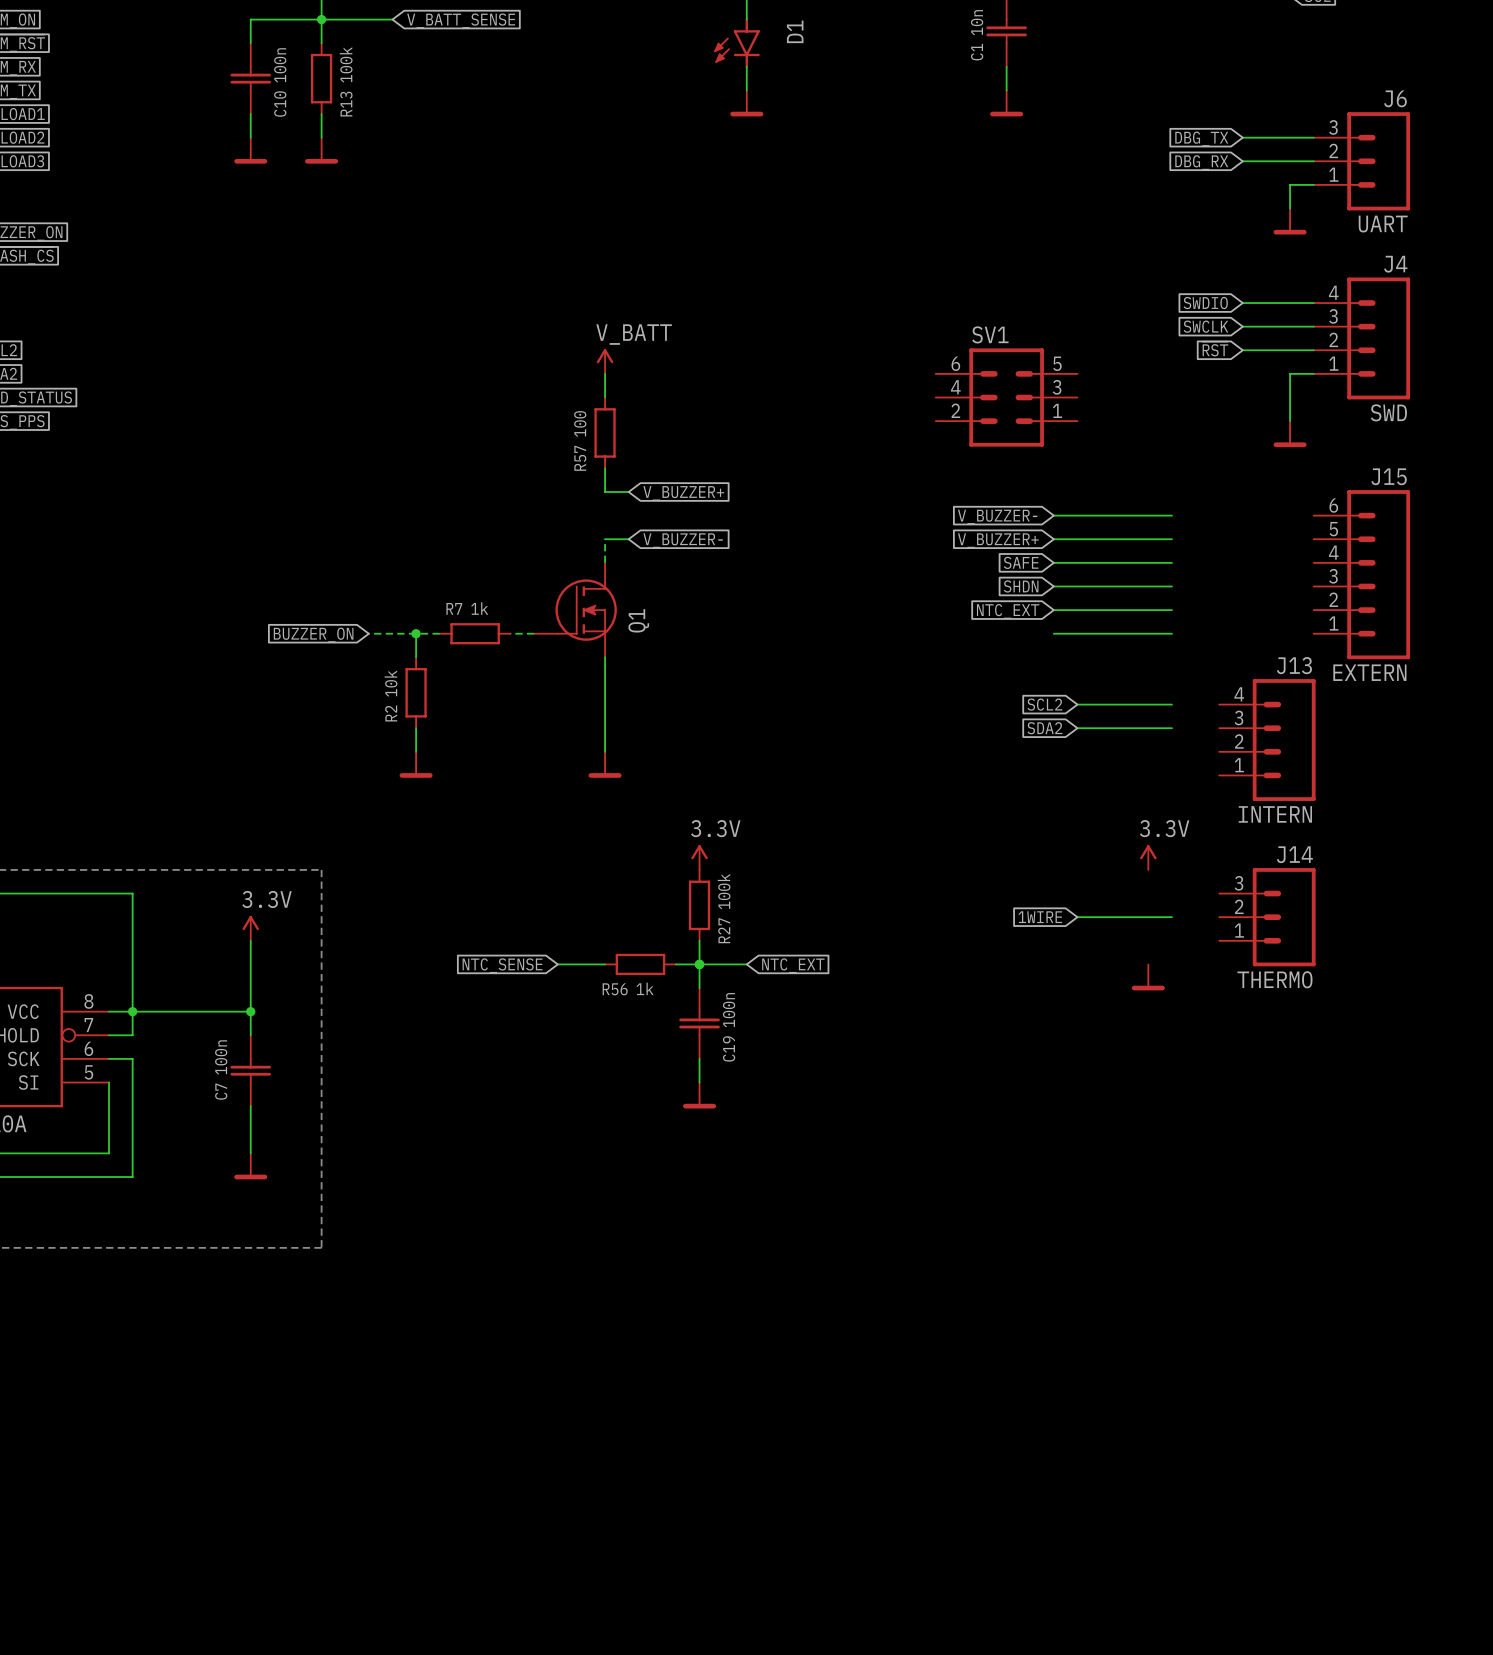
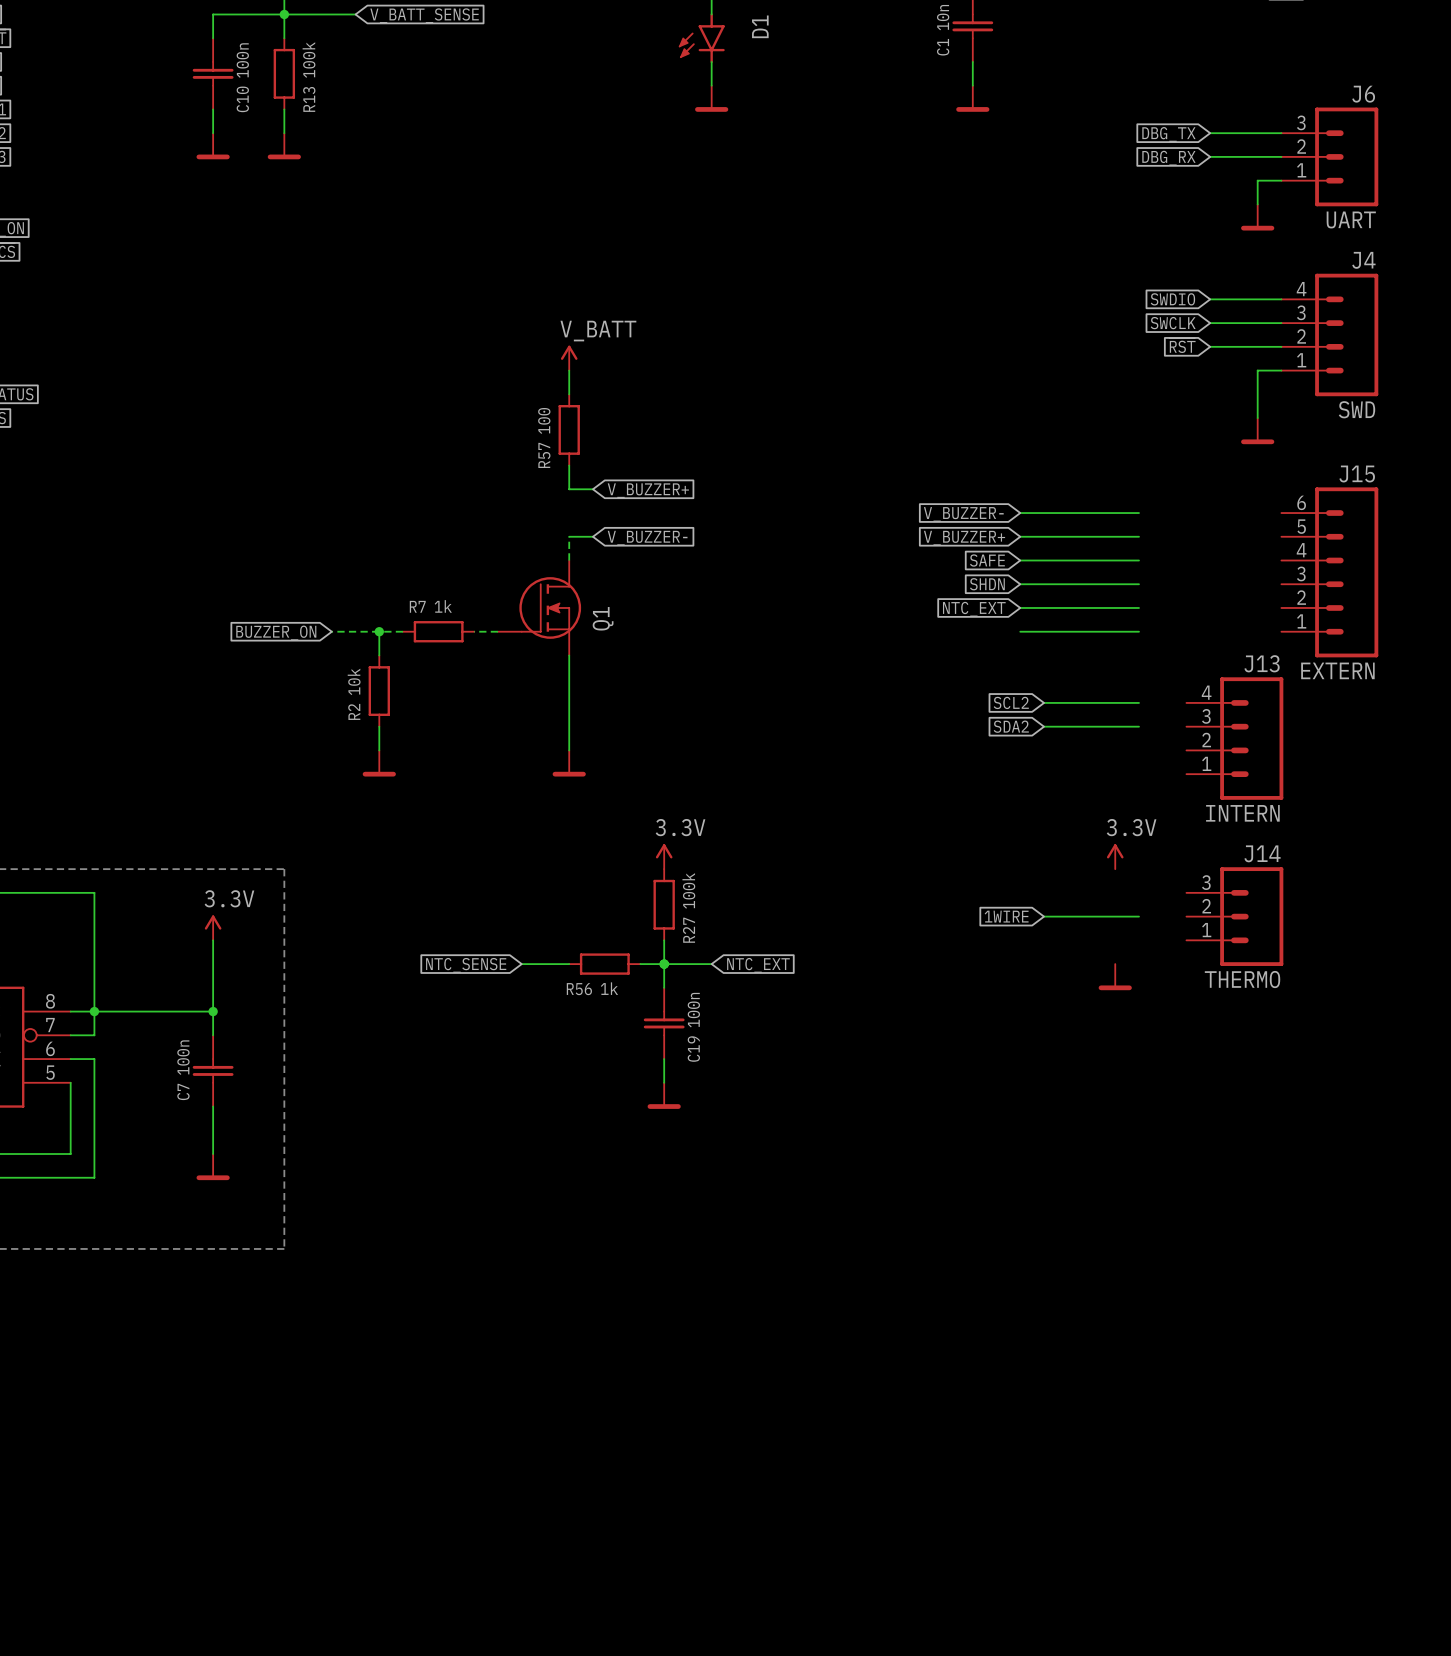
SV1: (1006, 397) -> none

